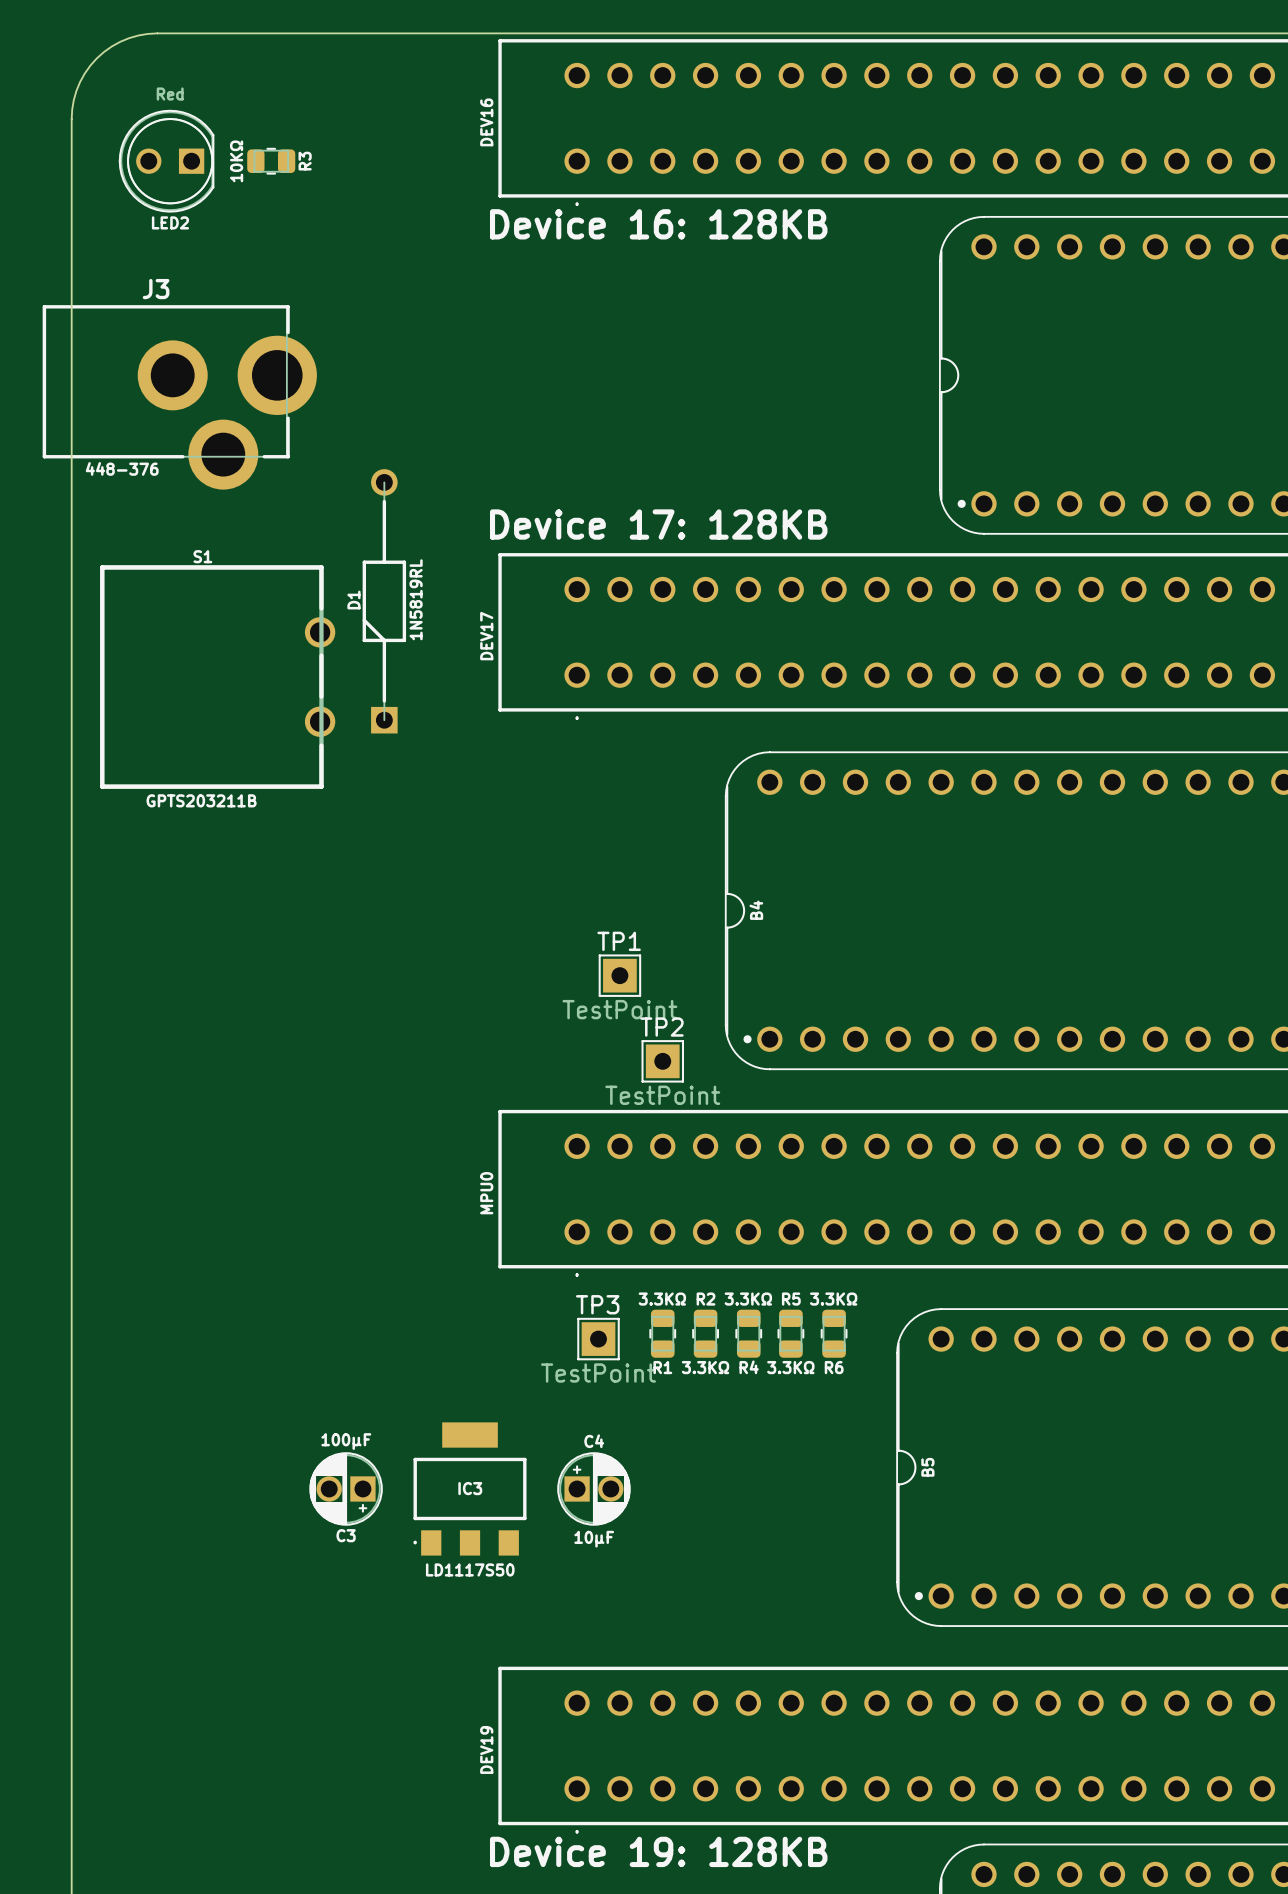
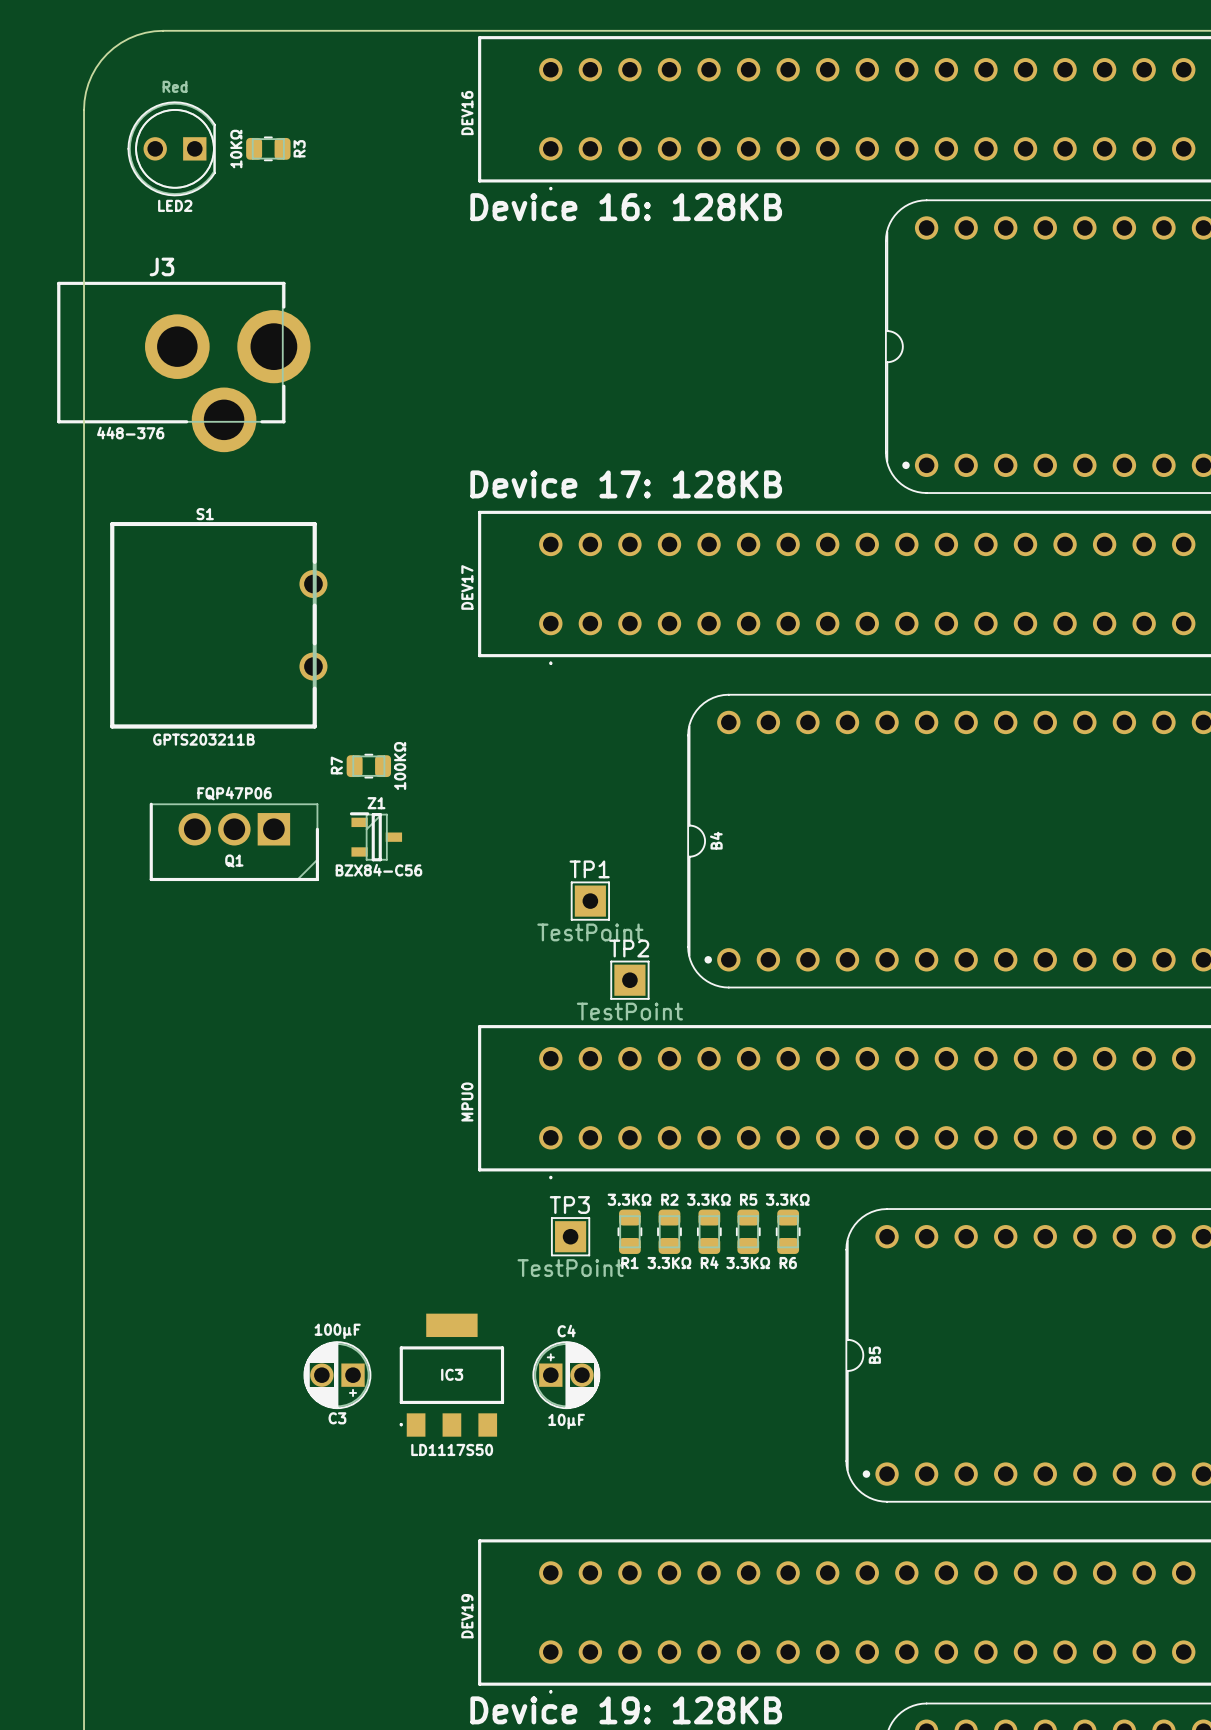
D1: 1N5819RL (384, 601) -> none
R7: none -> 100KΩ (368, 766)
Z1: none -> (375, 836)
Q1: none -> (234, 841)

